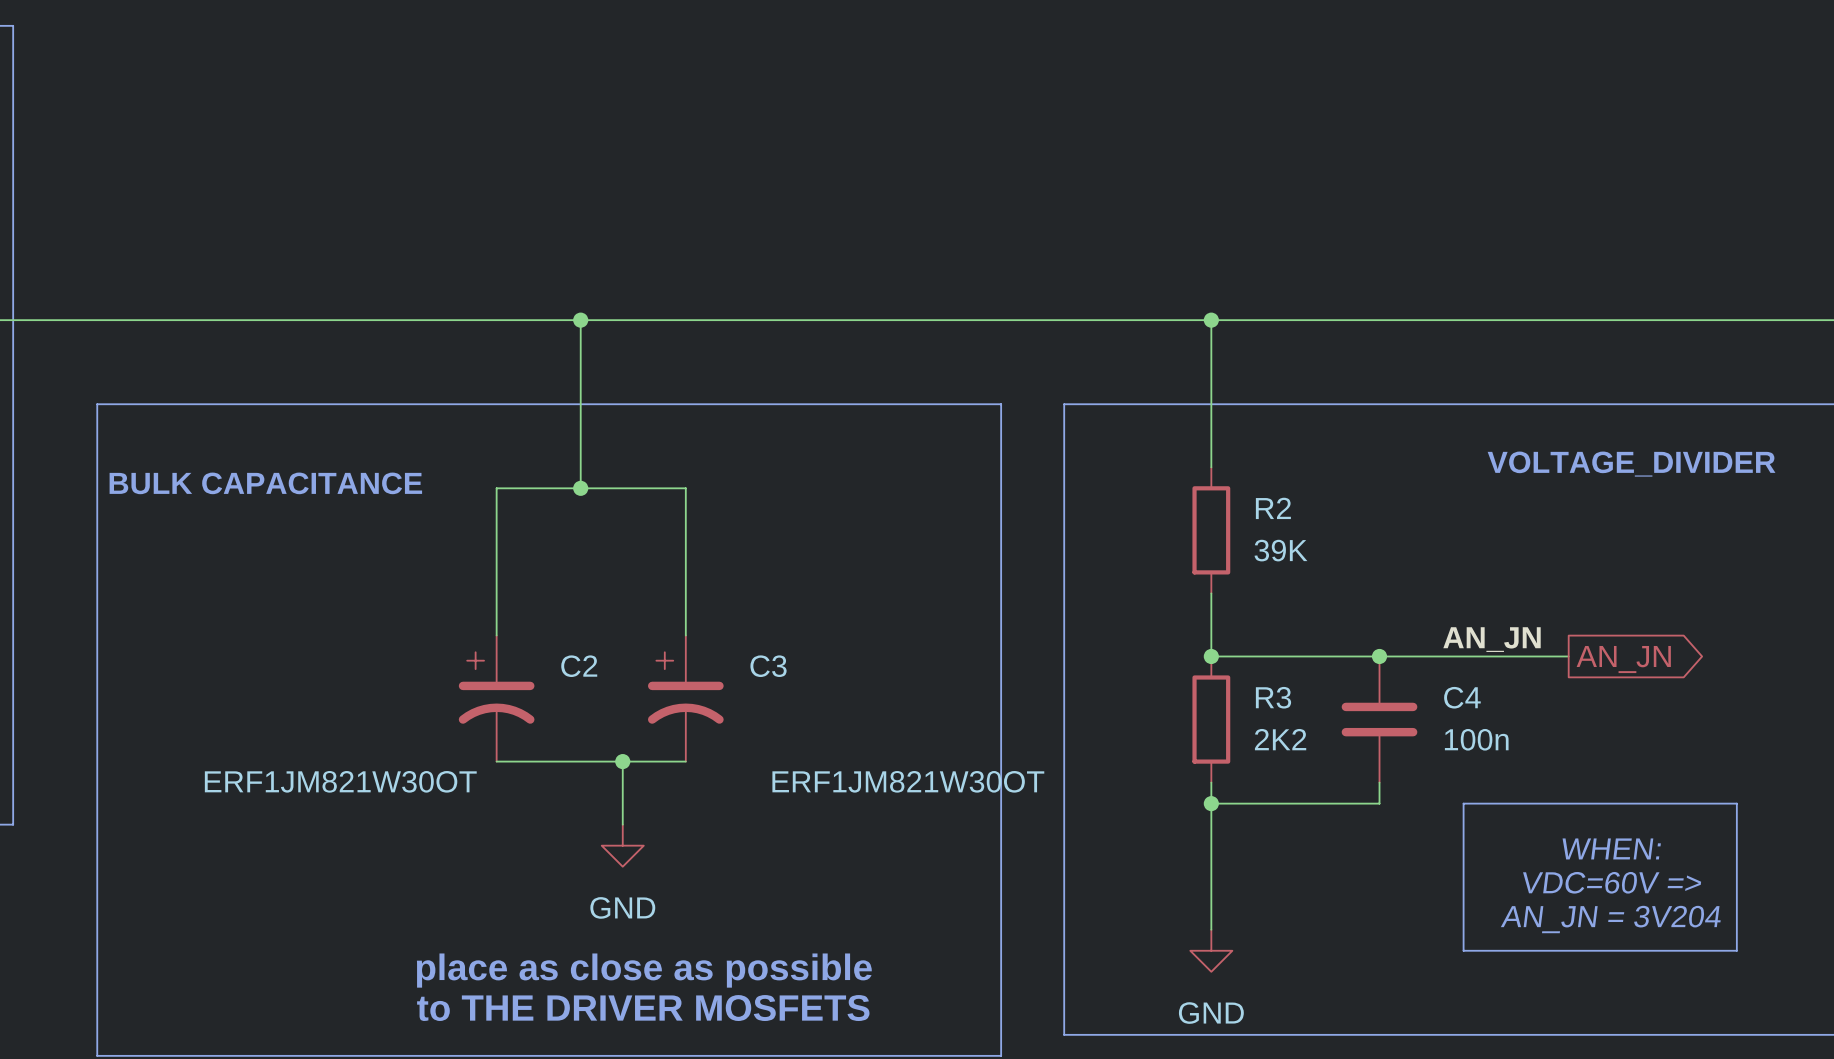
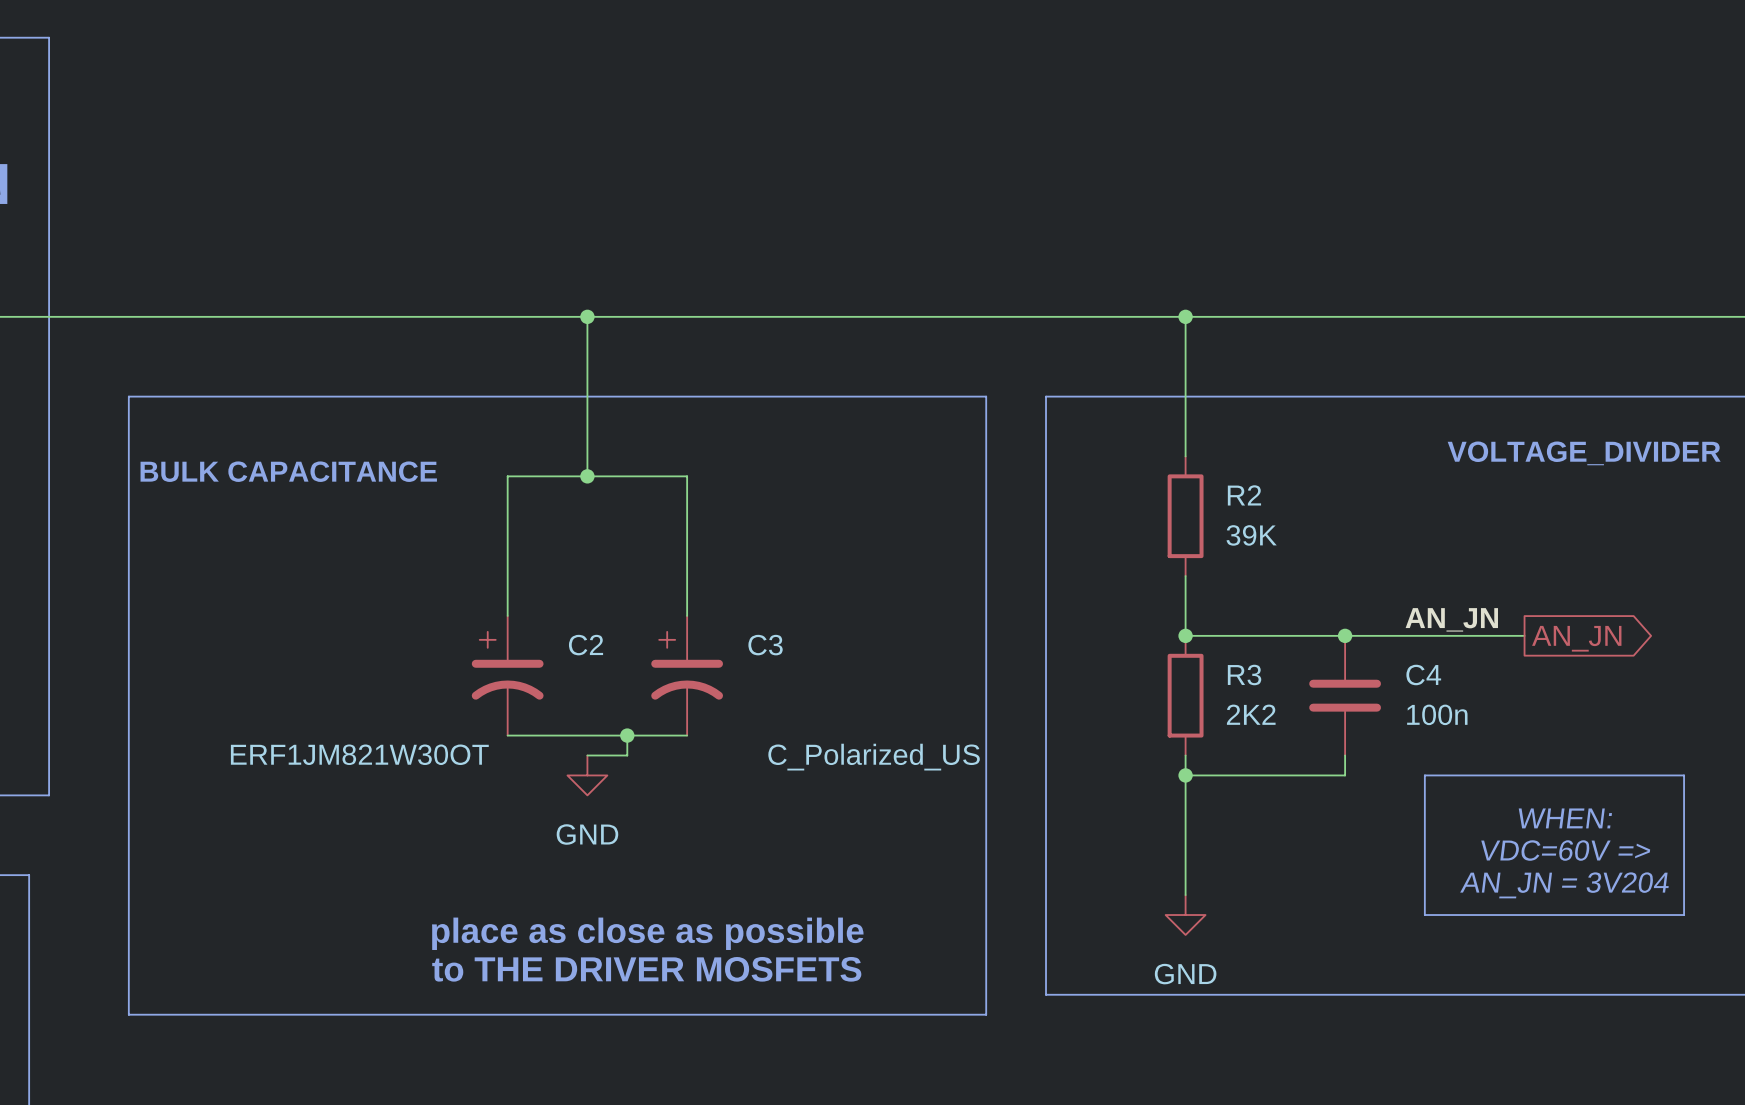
C3 value: ERF1JM821W30OT (908, 781) -> C_Polarized_US (874, 757)
wire: (622, 782) (622, 824) -> (627, 755) (587, 755)
power symbol position: GND (622, 845) -> GND (587, 775)

